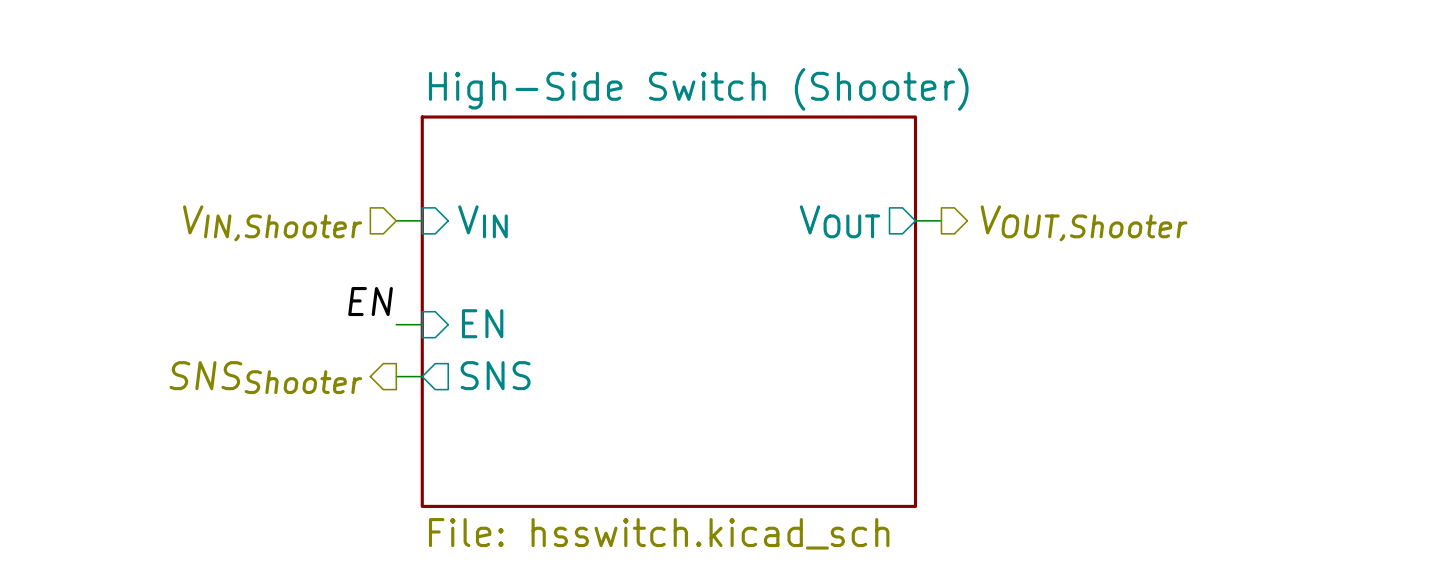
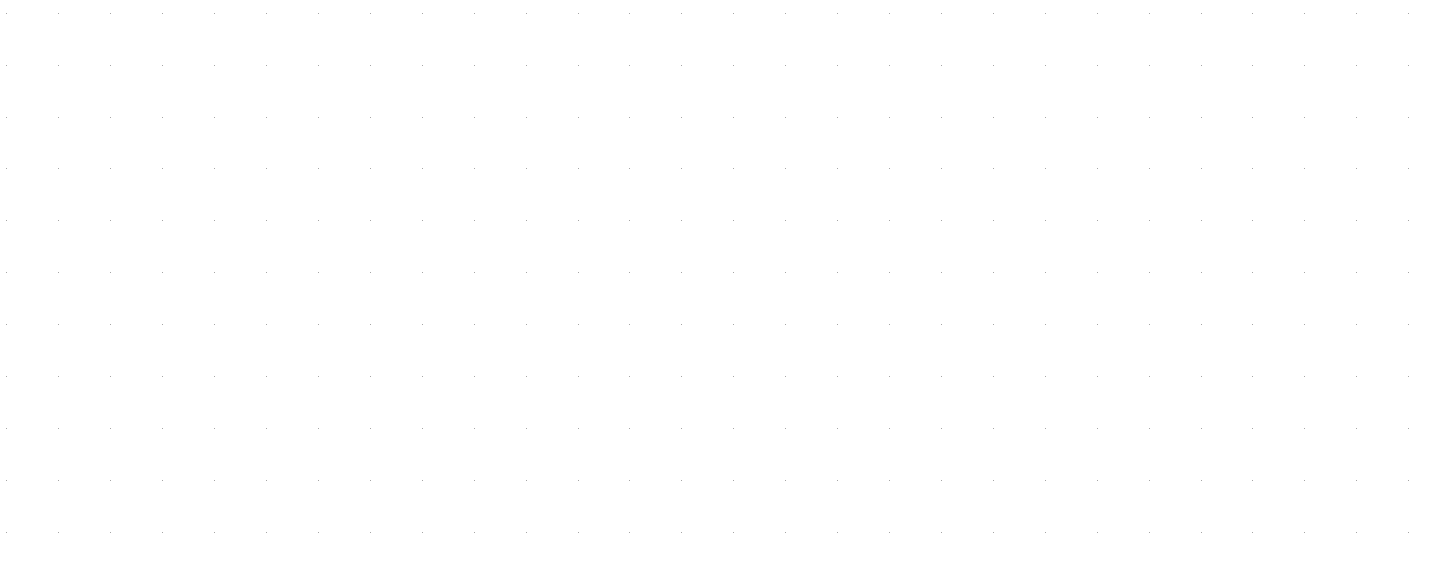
wire: (396, 220) (422, 220) -> none
wire: (915, 220) (941, 220) -> none
sheet pin: VIN (483, 221) -> none
sheet pin: VOUT (839, 221) -> none
hierarchical label: VIN,Shooter (272, 223) -> none
hierarchical label: VOUT,Shooter (1084, 223) -> none
label: EN (370, 301) -> none
sheet High-Side Switch (Shooter): File: hsswitch.kicad_sch (668, 311) -> none
sheet pin: EN (482, 323) -> none
wire: (396, 324) (422, 324) -> none
sheet pin: SNS (495, 375) -> none
wire: (396, 376) (422, 376) -> none
hierarchical label: SNSShooter (265, 377) -> none

